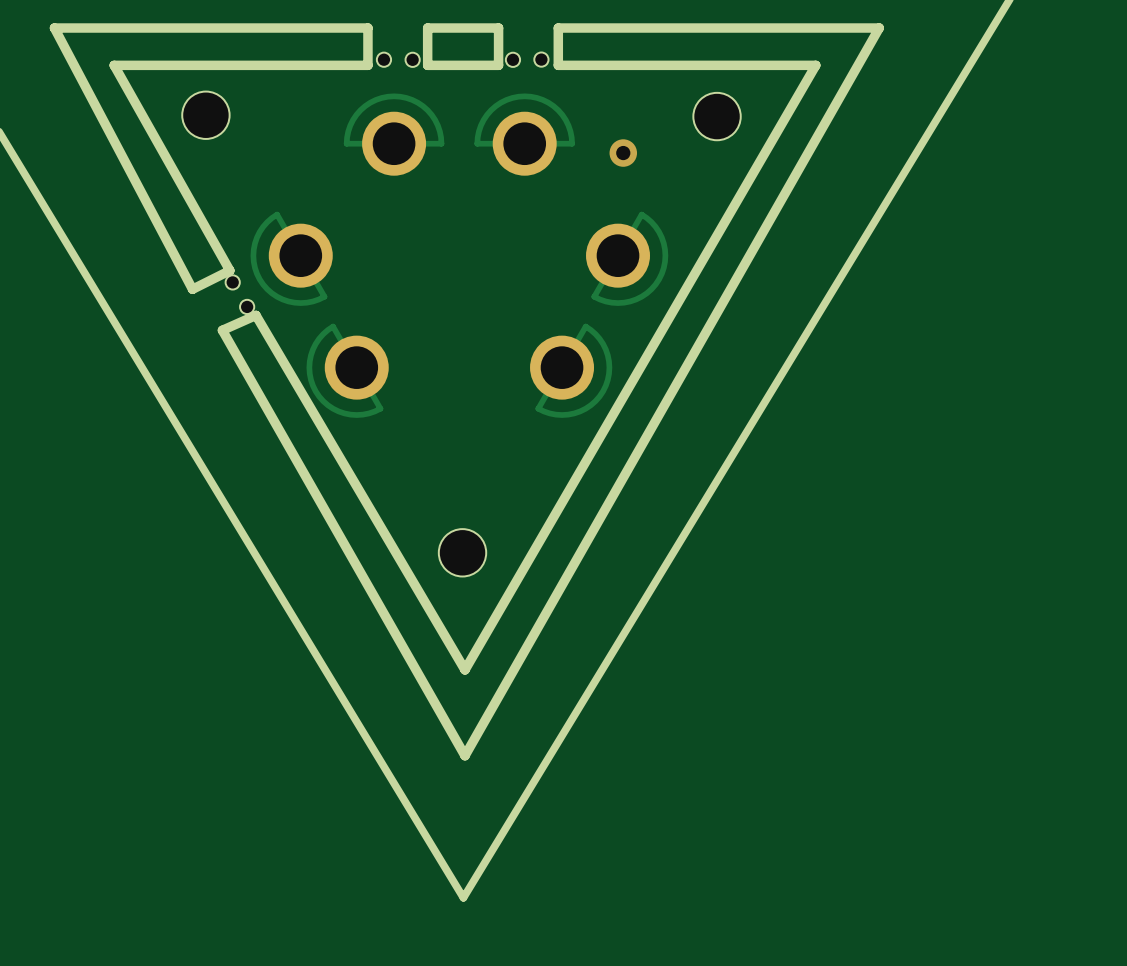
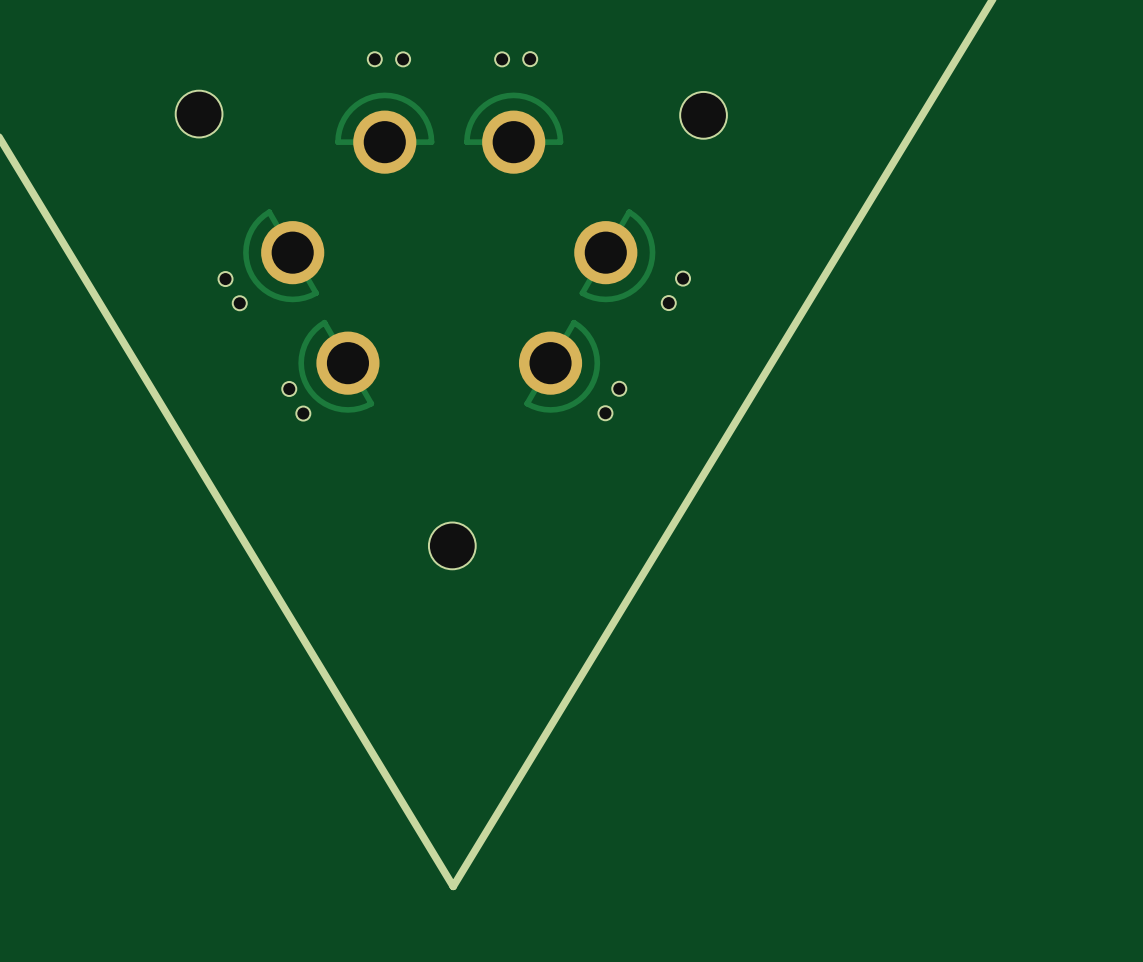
board edge: (367, 28) (54, 28) (192, 289) (229, 270) (114, 65) (367, 65) (367, 28) -> none
board edge: (498, 28) (498, 65) (427, 65) (427, 28) (498, 28) -> none
board edge: (879, 28) (558, 28) (558, 65) (815, 65) (464, 669) (255, 315) (222, 330) (464, 755) (879, 28) -> none
via: (623, 153) -> none
hole: none -> (683, 278)
hole: none -> (668, 303)
hole: none -> (289, 388)
hole: none -> (619, 388)
hole: none -> (303, 413)
hole: none -> (605, 413)

